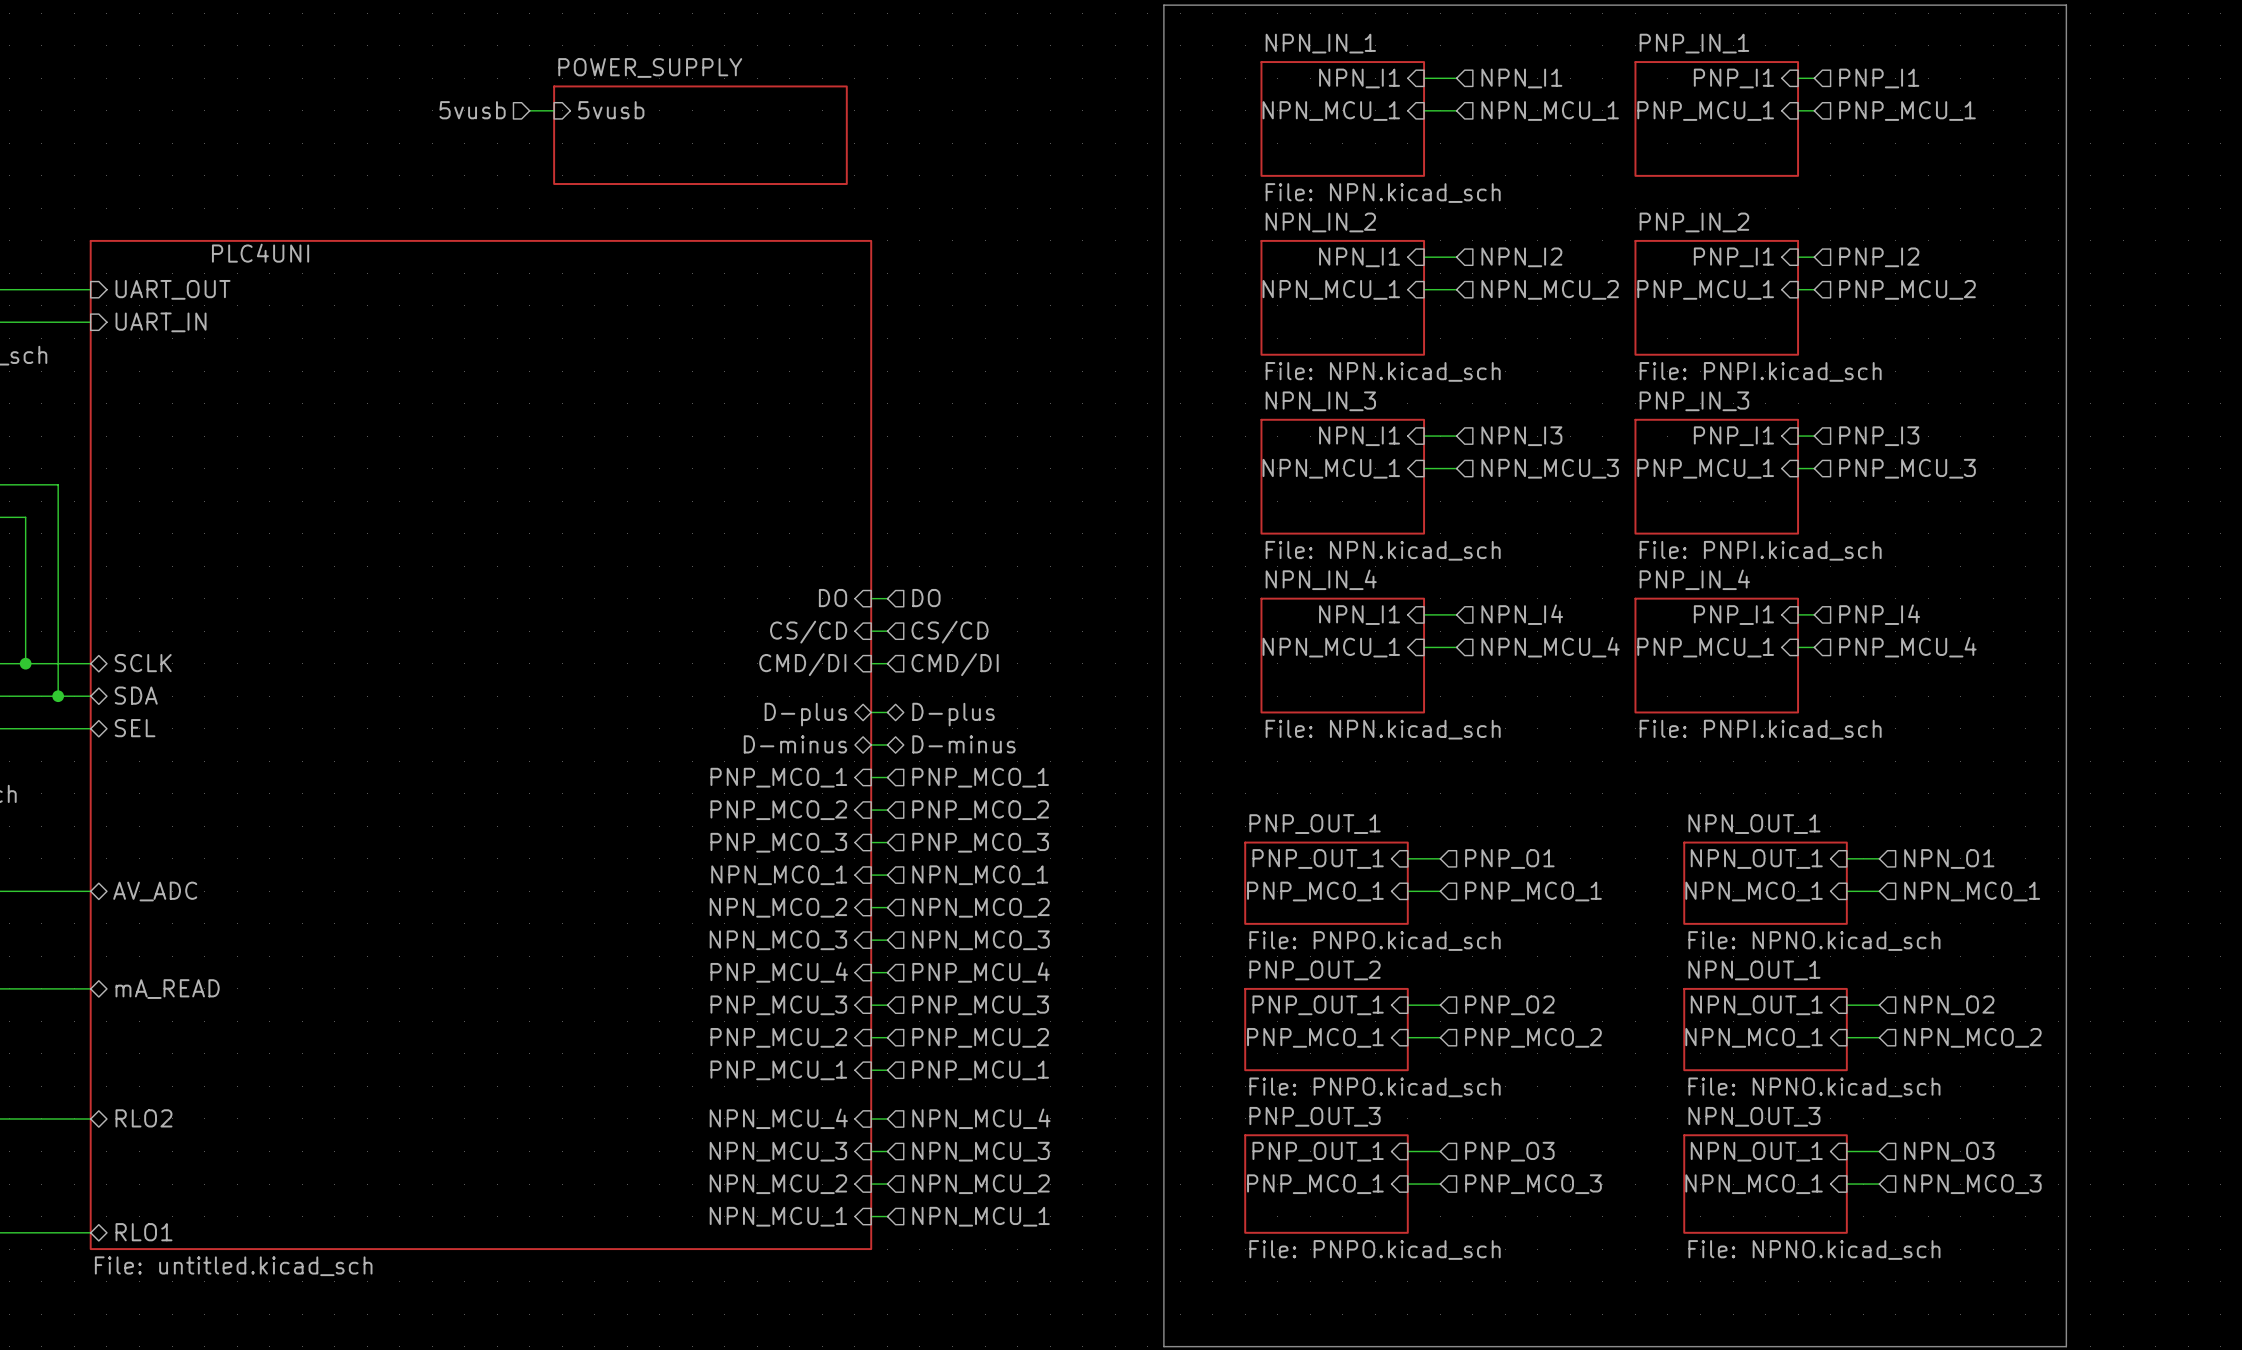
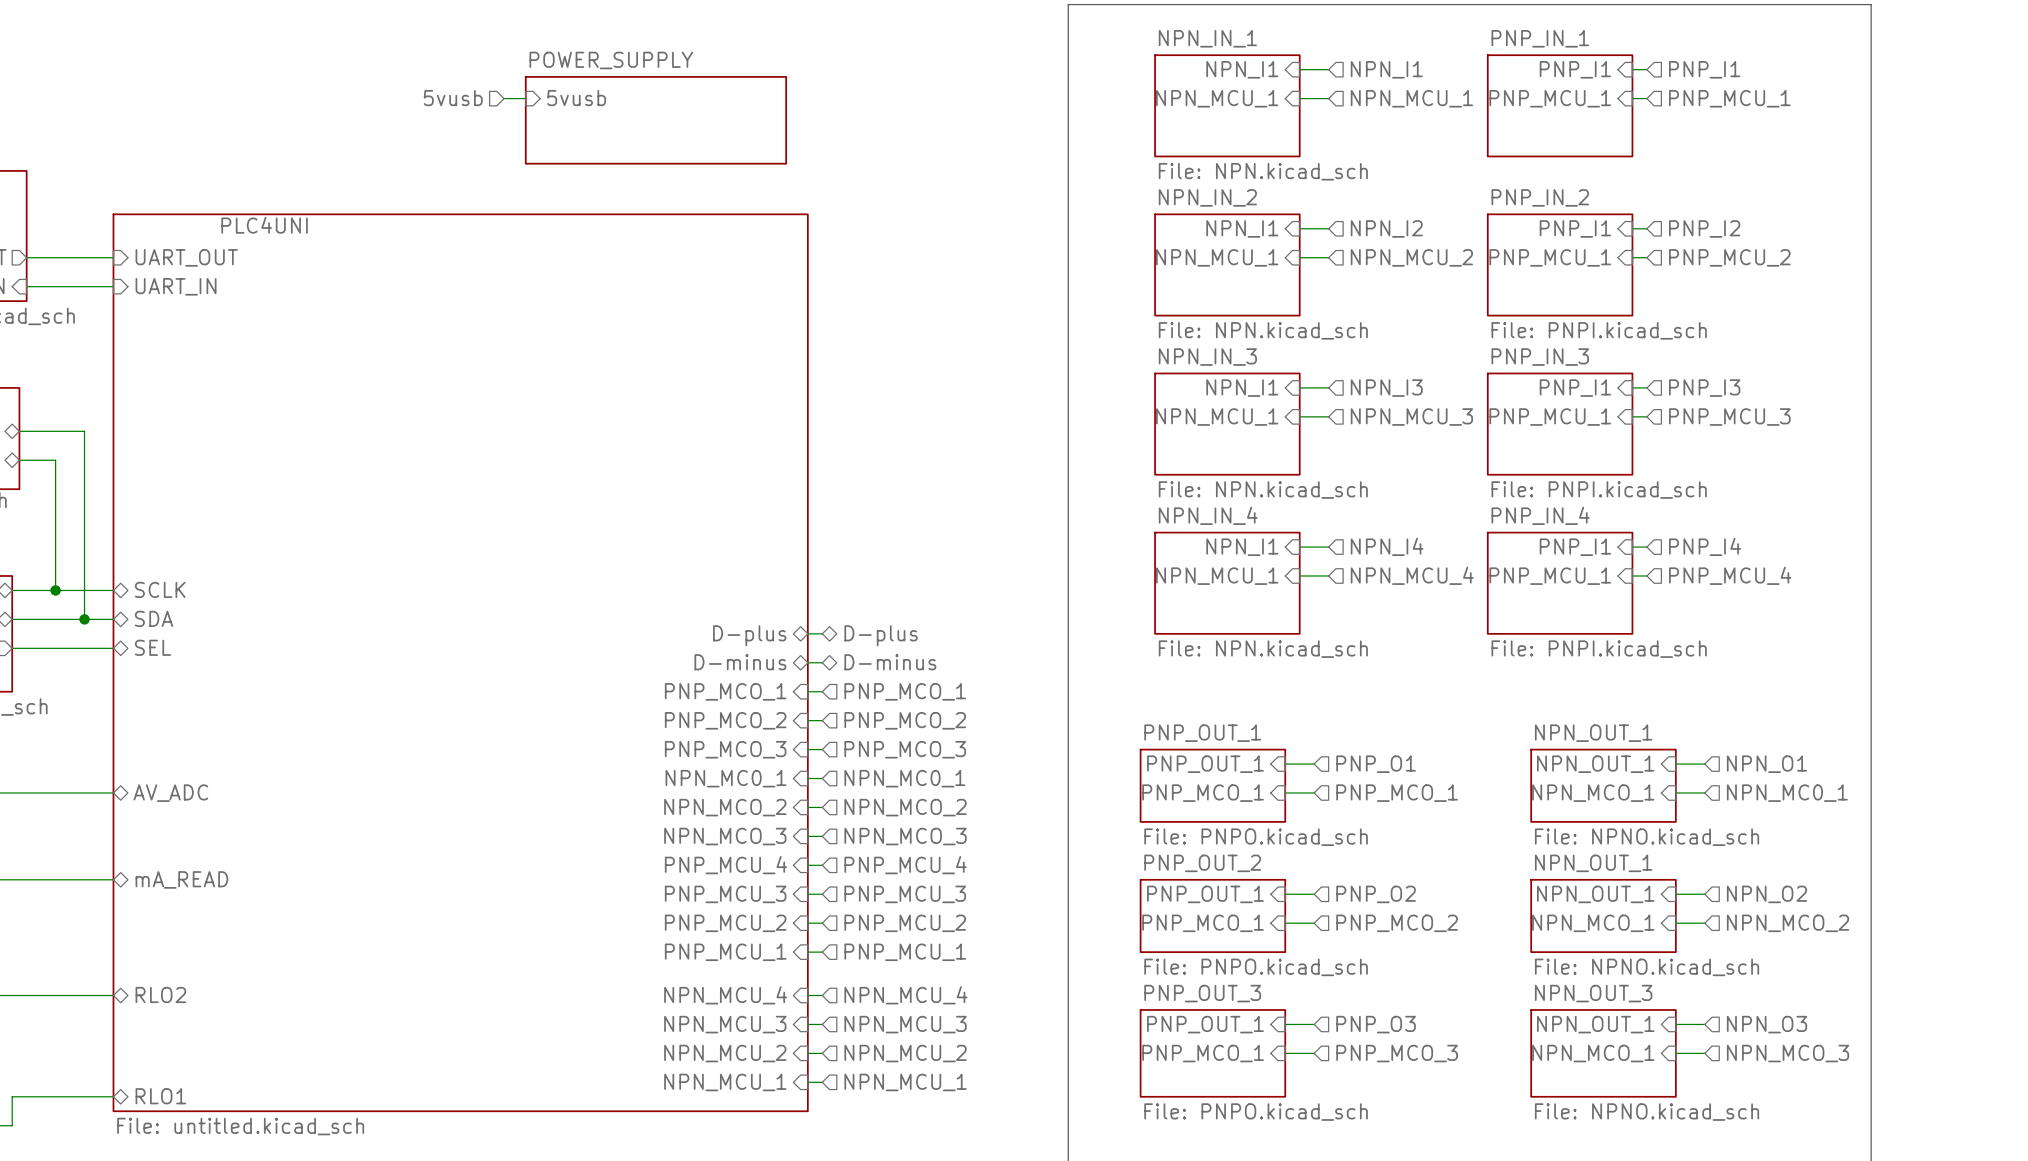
sheet pin: DO (833, 598) -> none
wire: (871, 598) (887, 598) -> none
hierarchical label: DO (926, 598) -> none
wire: (871, 631) (887, 631) -> none
sheet pin: CS/CD (808, 632) -> none
hierarchical label: CS/CD (950, 632) -> none
wire: (871, 663) (887, 663) -> none
sheet pin: CMD/DI (802, 664) -> none
hierarchical label: CMD/DI (955, 664) -> none

